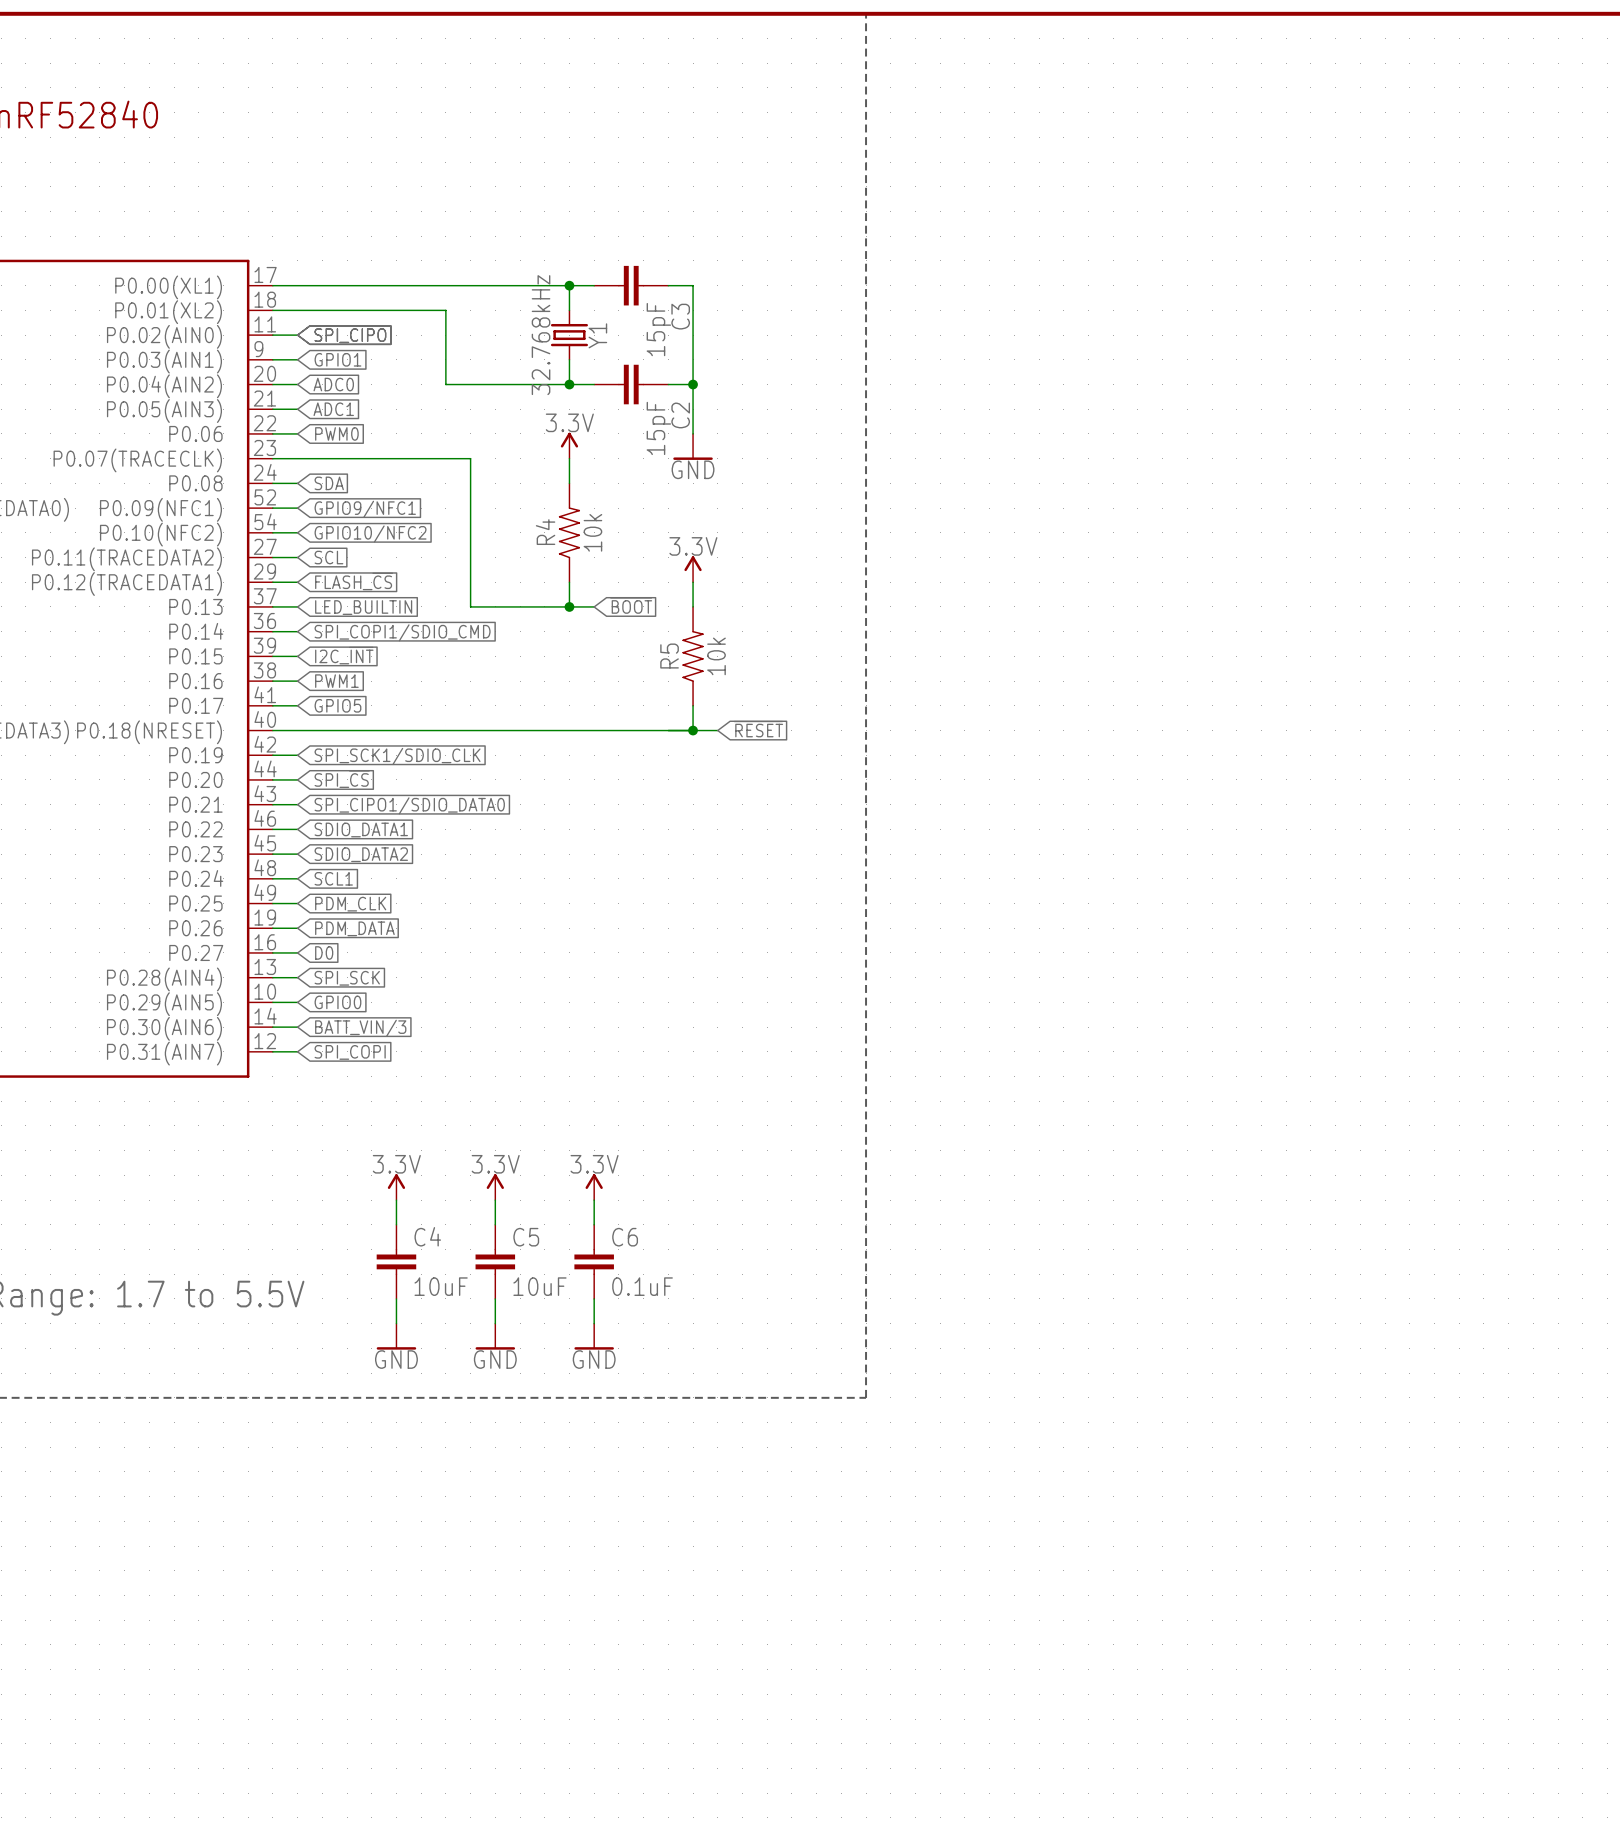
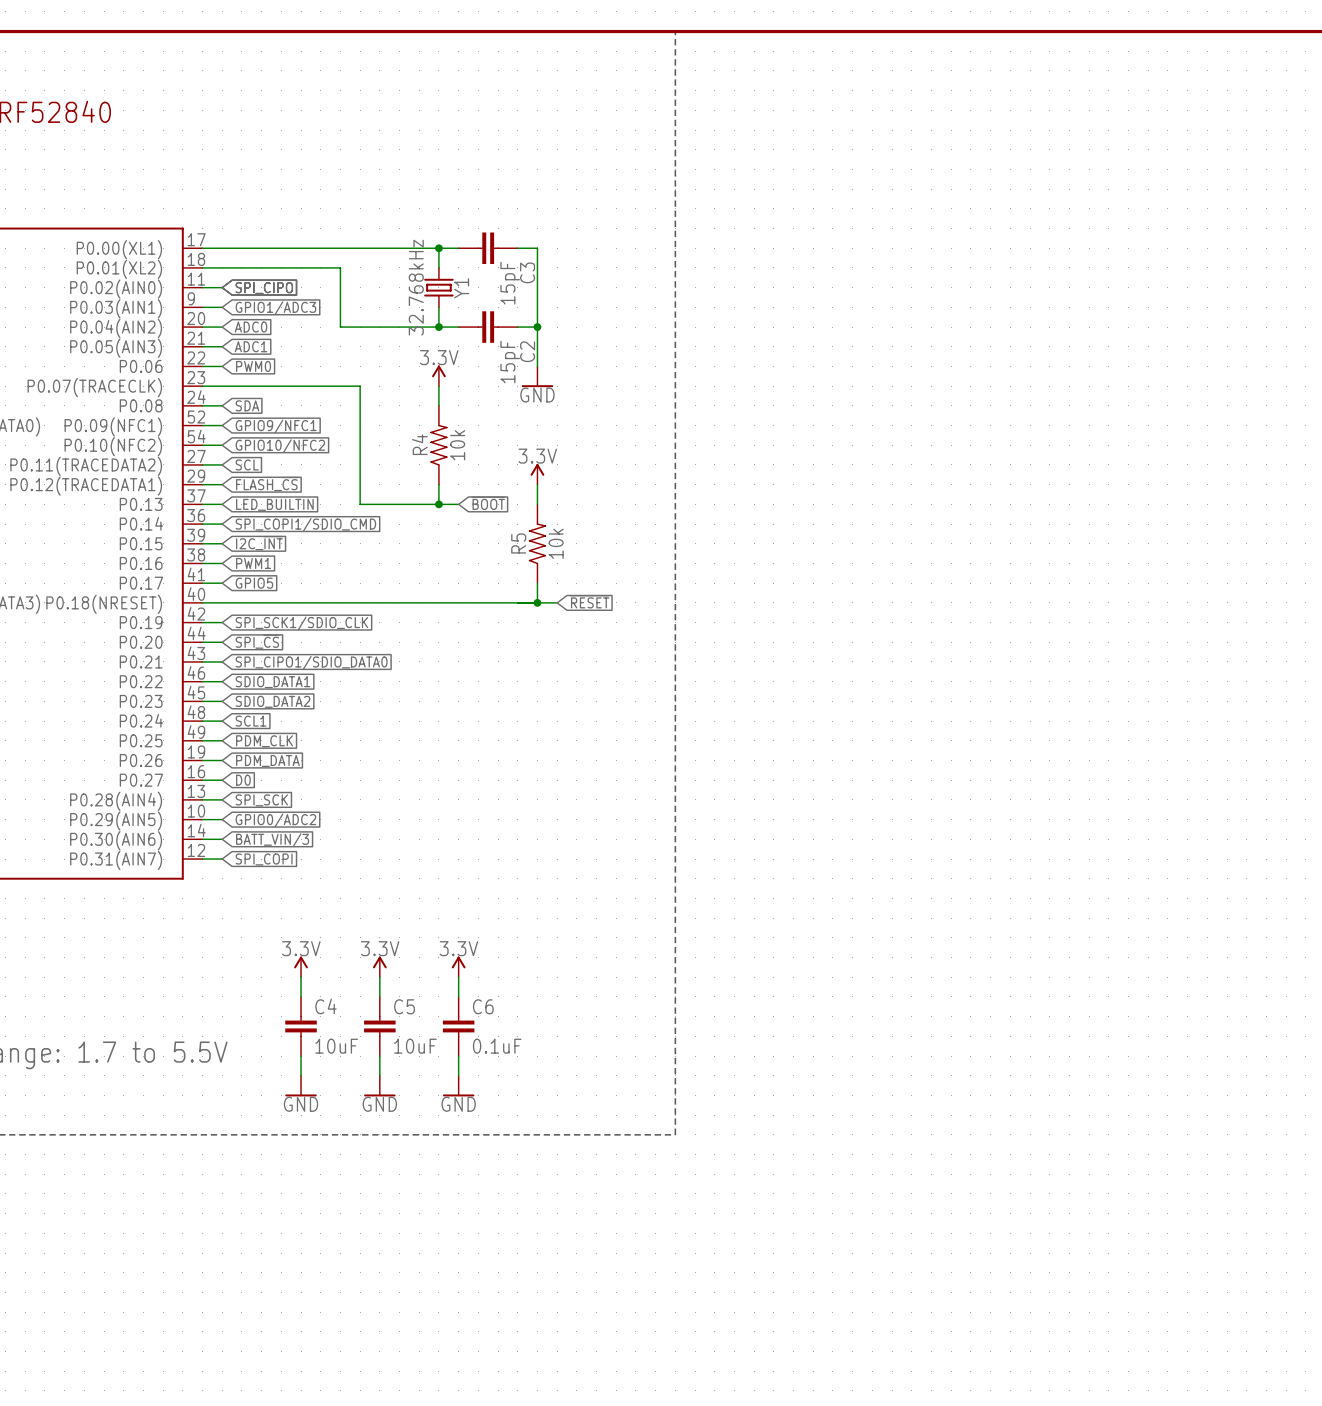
global label: GPIO1 (337, 359) -> GPIO1/ADC3 (275, 308)
global label: GPIO0 (337, 1002) -> GPIO0/ADC2 (275, 820)

